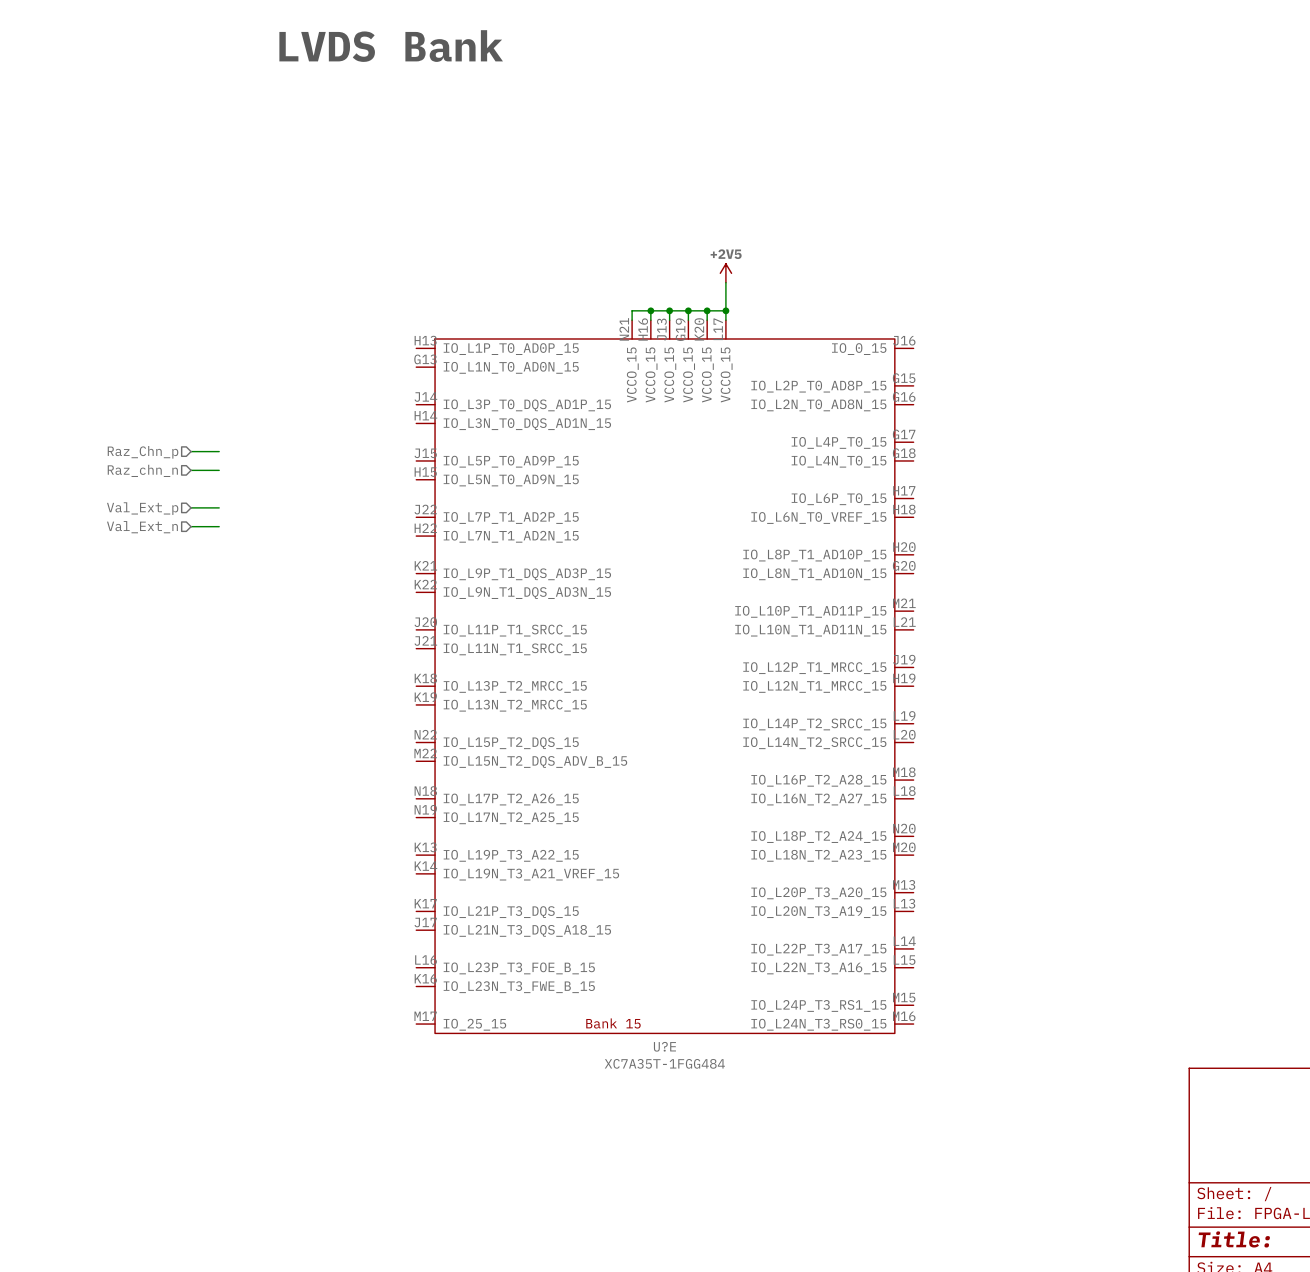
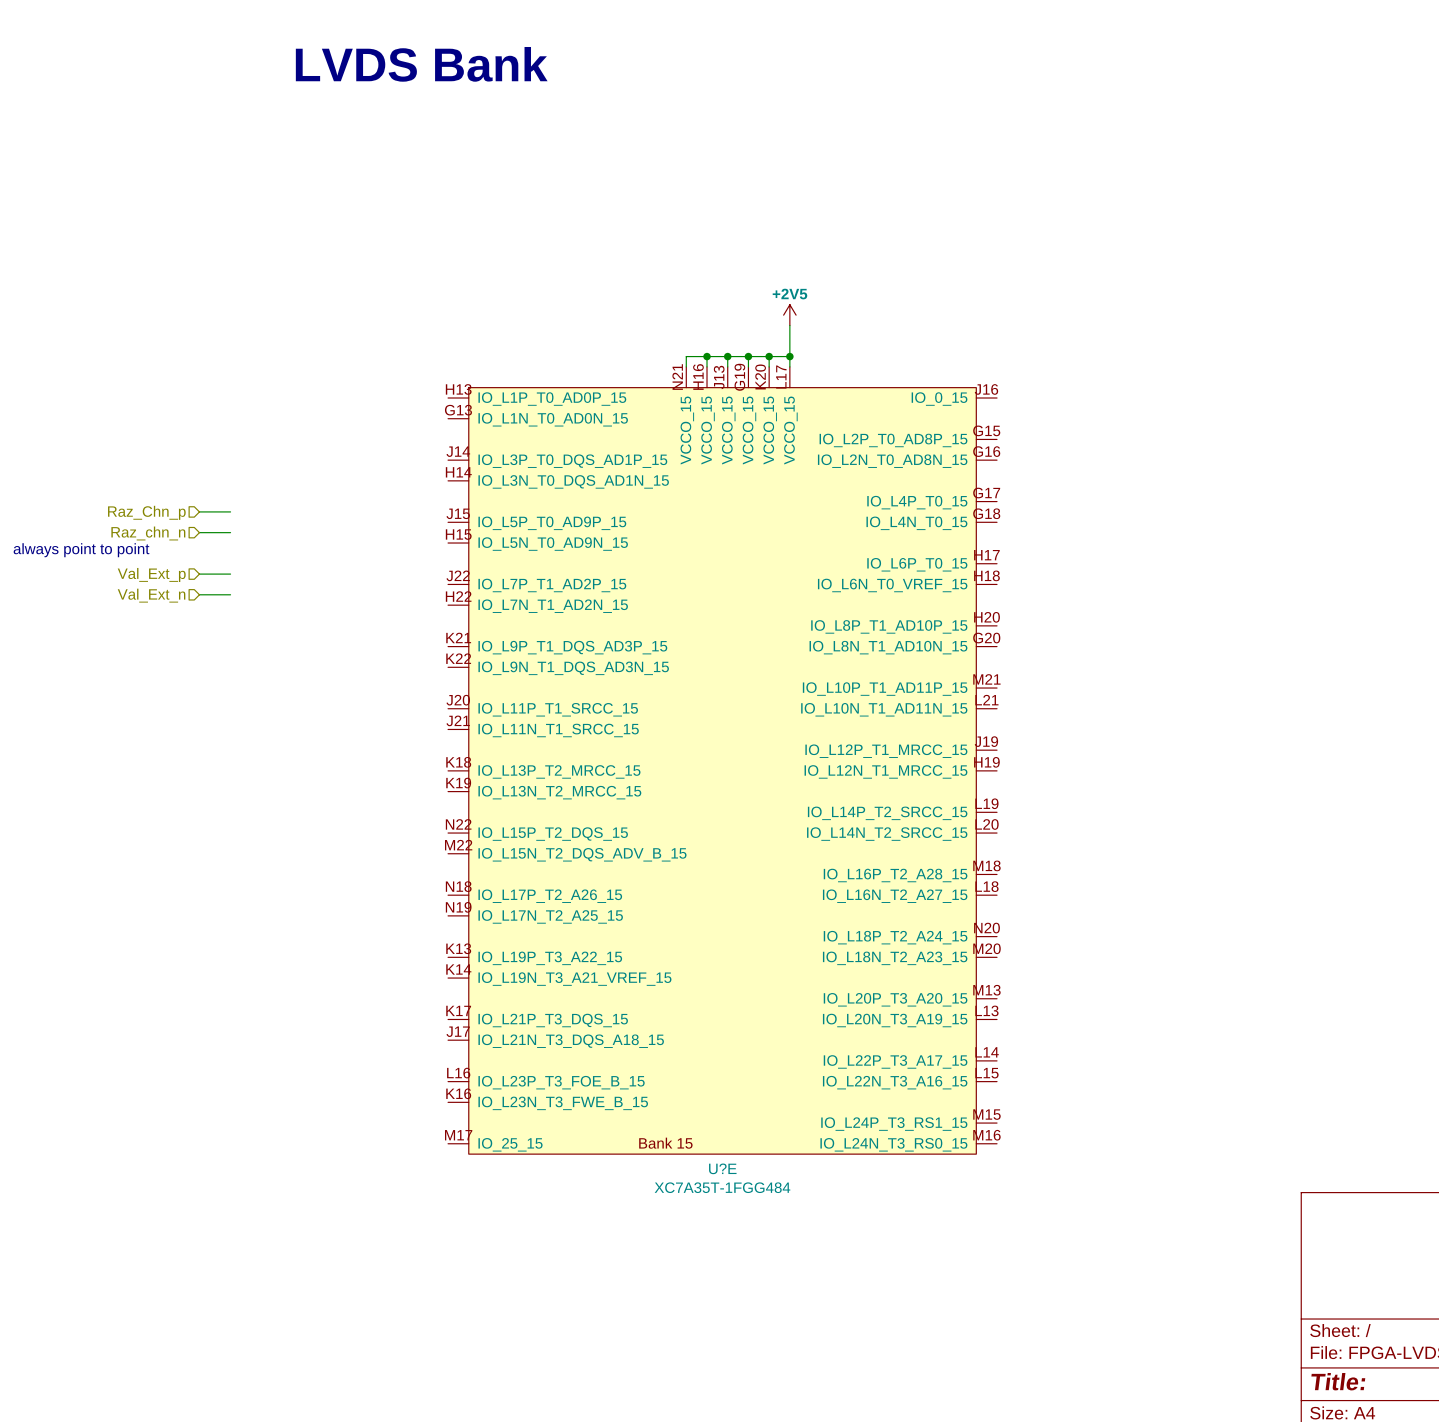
text: none -> always point to point (81, 550)

